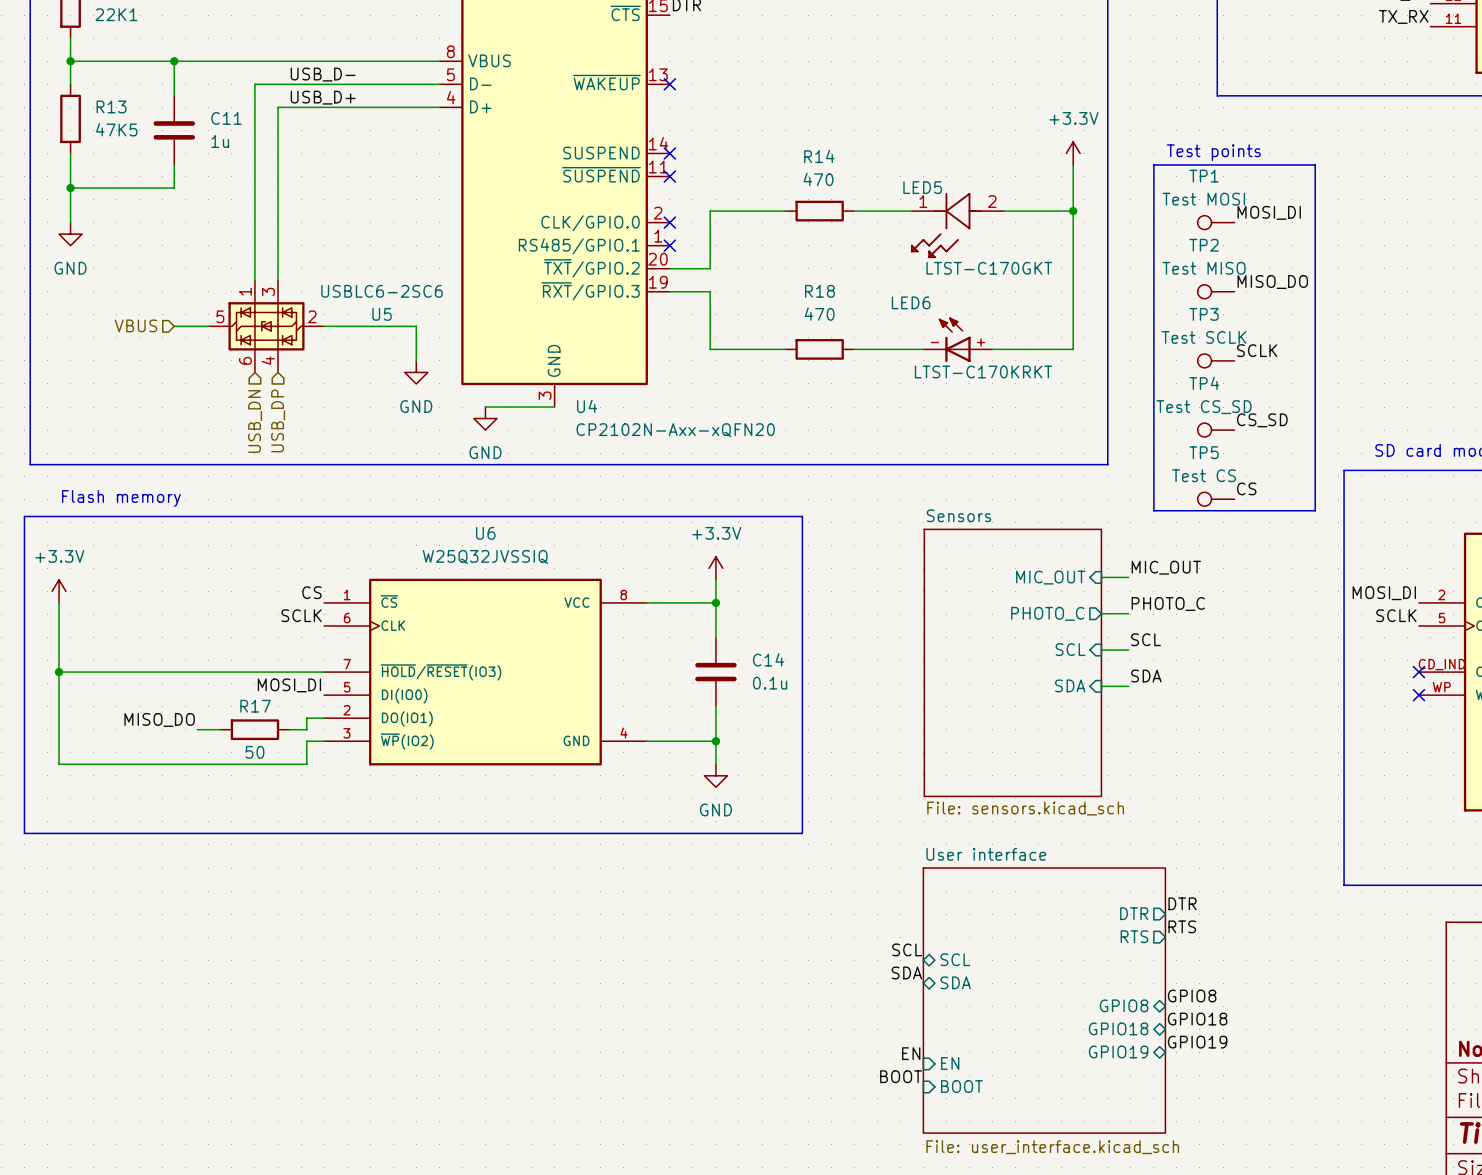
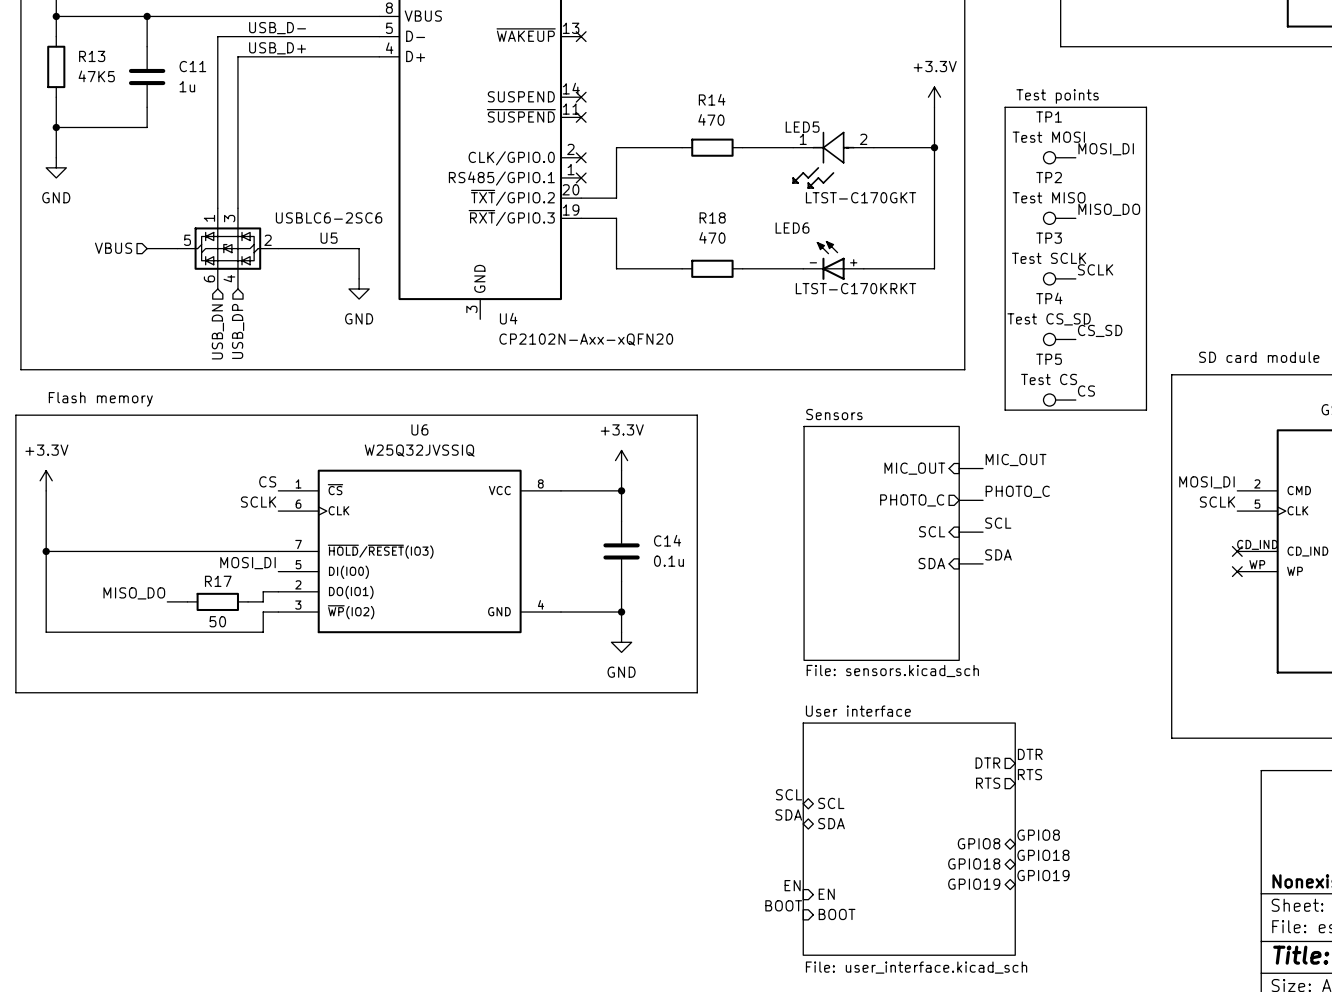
wire: (485, 407) (554, 407) -> none
power symbol: GND (485, 418) -> none

